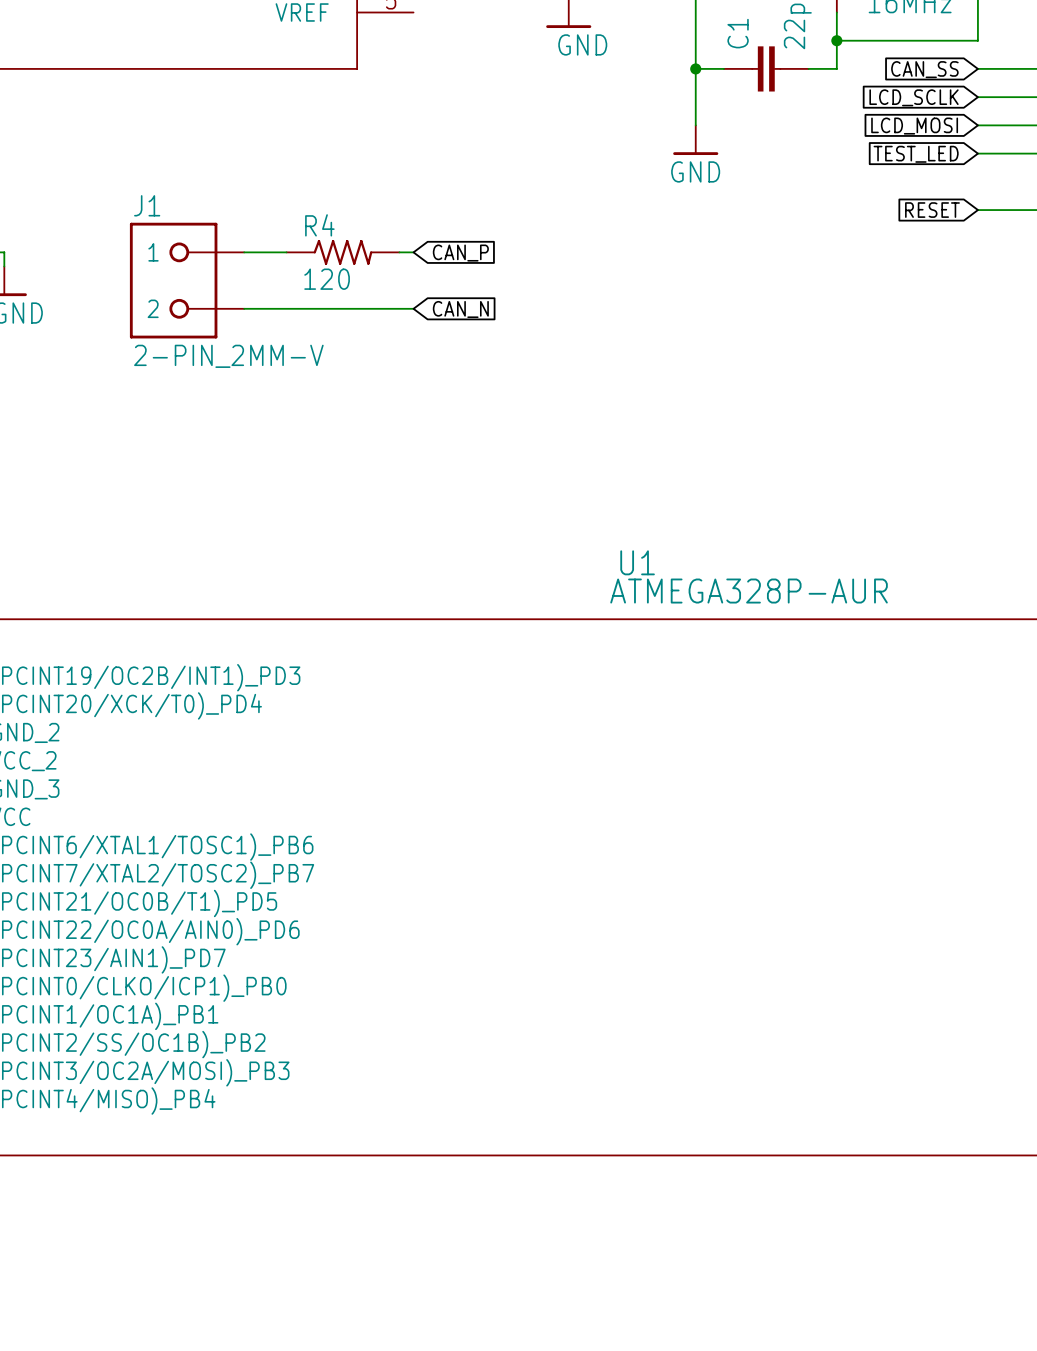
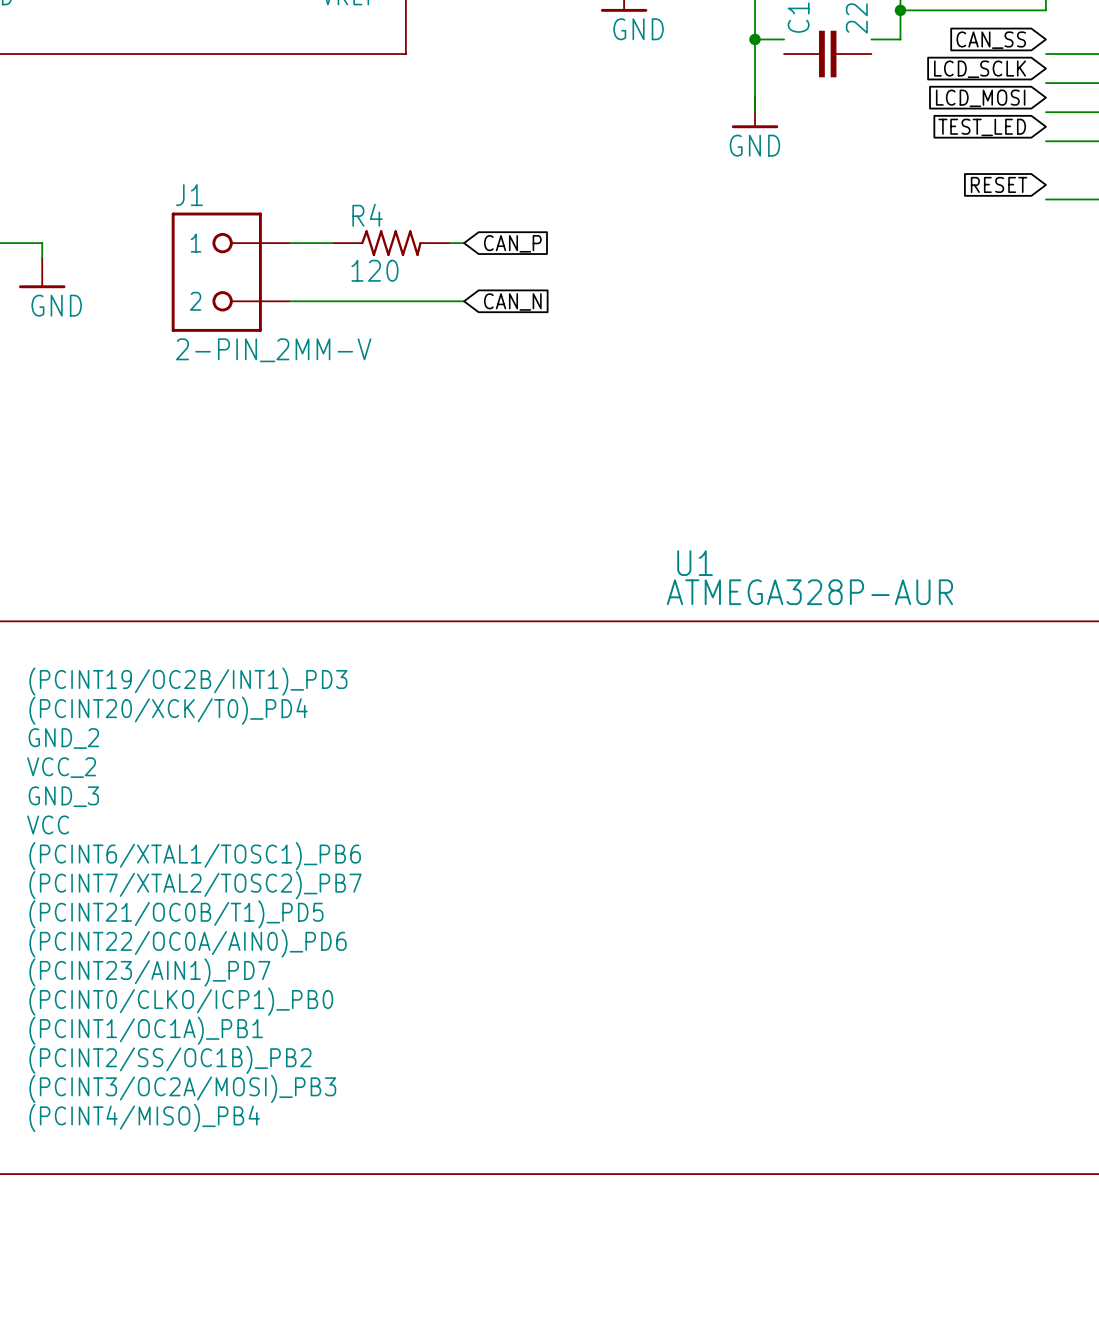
wire: (977, 26) (977, 40) (836, 40) -> (1045, 10) (900, 10)
junction position: (836, 40) -> (900, 10)
wire: (836, 54) (836, 68) (808, 68) -> (900, 39) (871, 39)
wire: (695, 68) (723, 68) -> (755, 39) (784, 39)
junction position: (695, 68) -> (755, 39)
global label position: CAN_SS (924, 69) -> CAN_SS (991, 40)
global label position: LCD_SCLK (914, 97) -> LCD_SCLK (980, 69)
global label position: LCD_MOSI (914, 126) -> LCD_MOSI (980, 98)
power symbol position: GND (695, 140) -> GND (755, 112)
global label position: TEST_LED (916, 154) -> TEST_LED (982, 127)
global label position: RESET (932, 210) -> RESET (999, 184)

